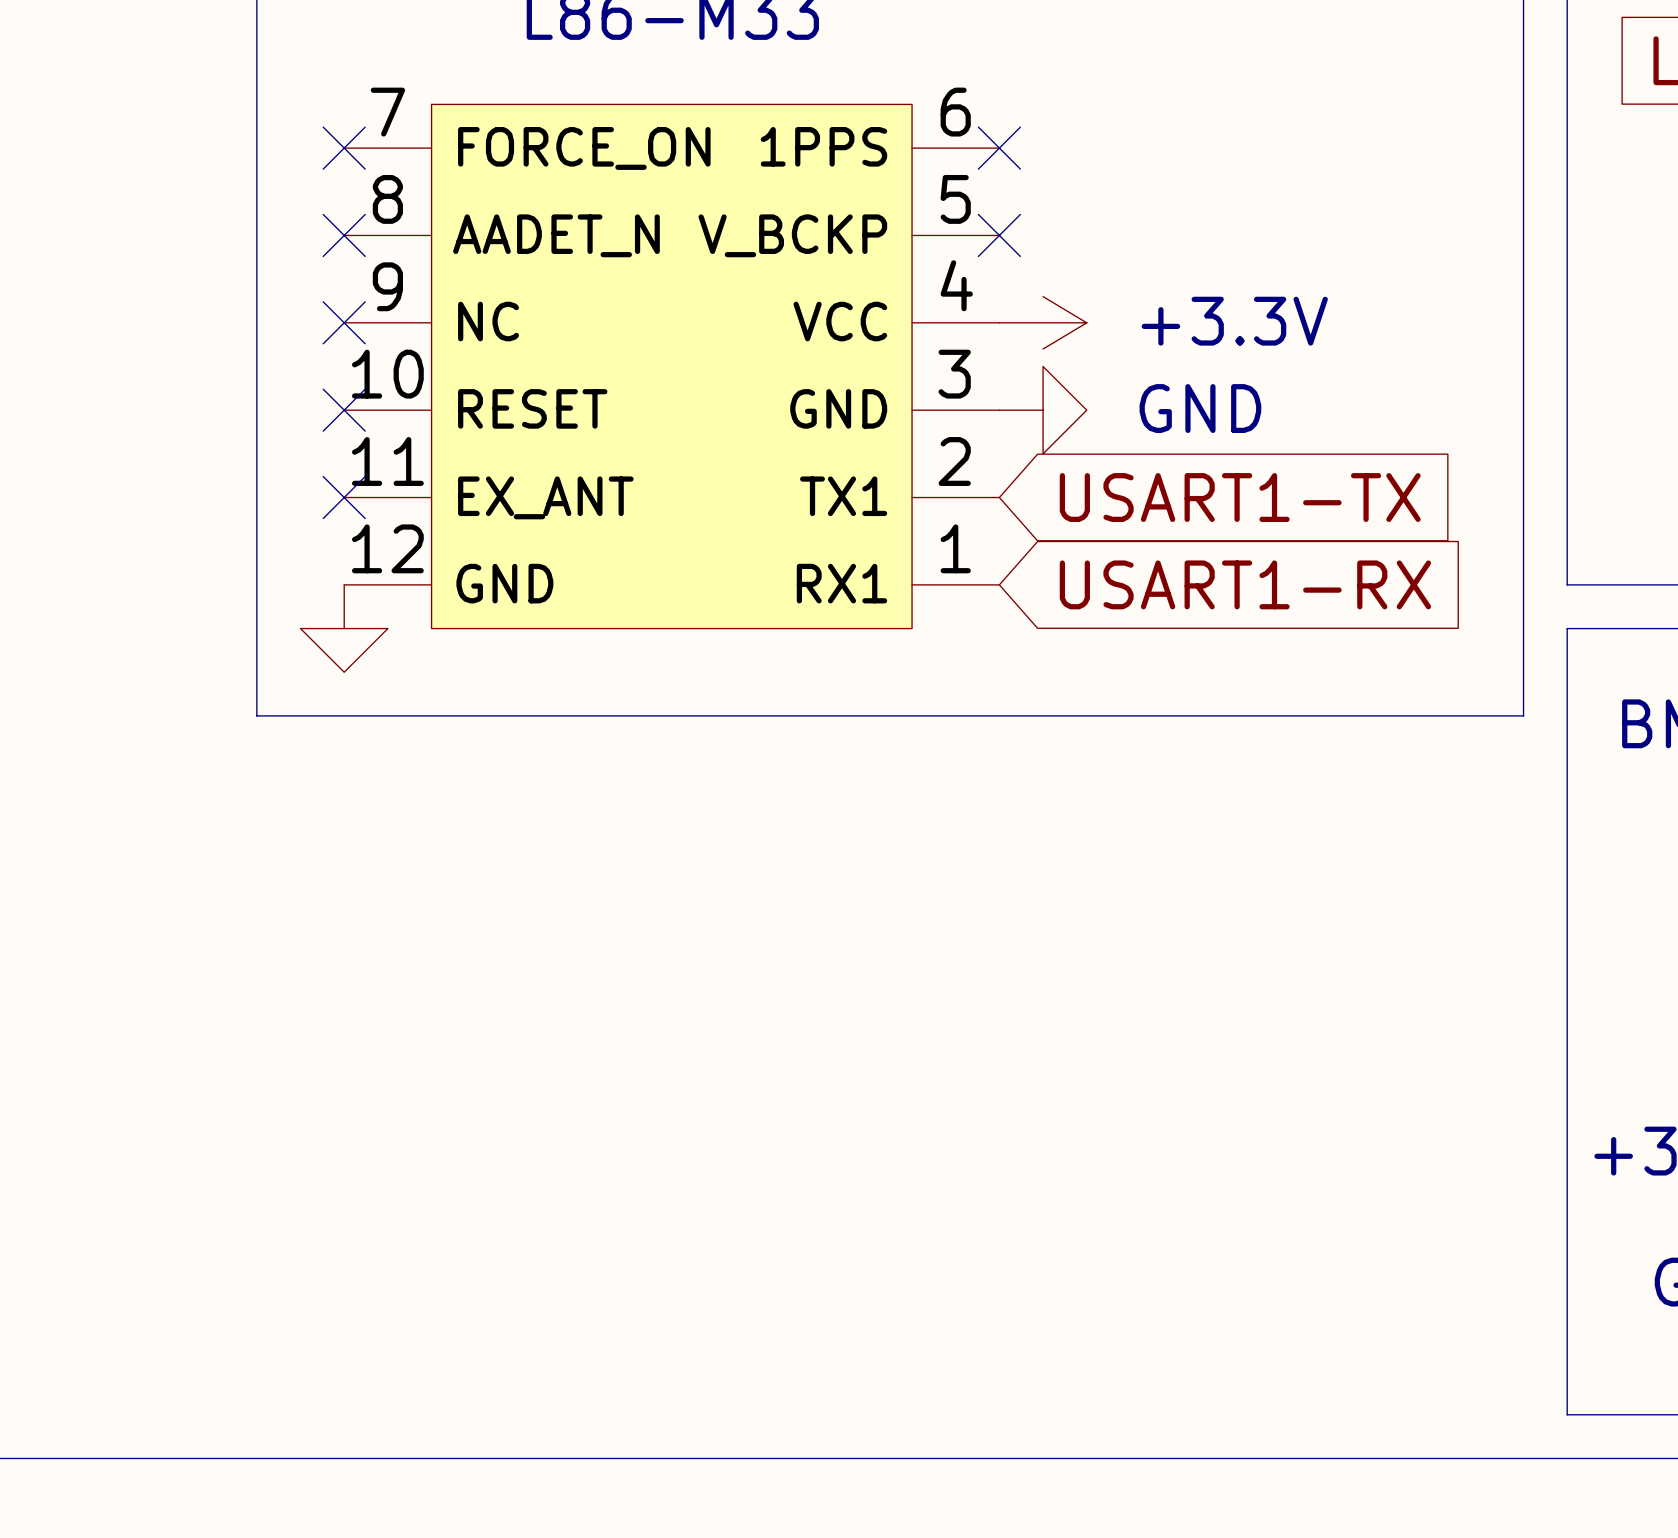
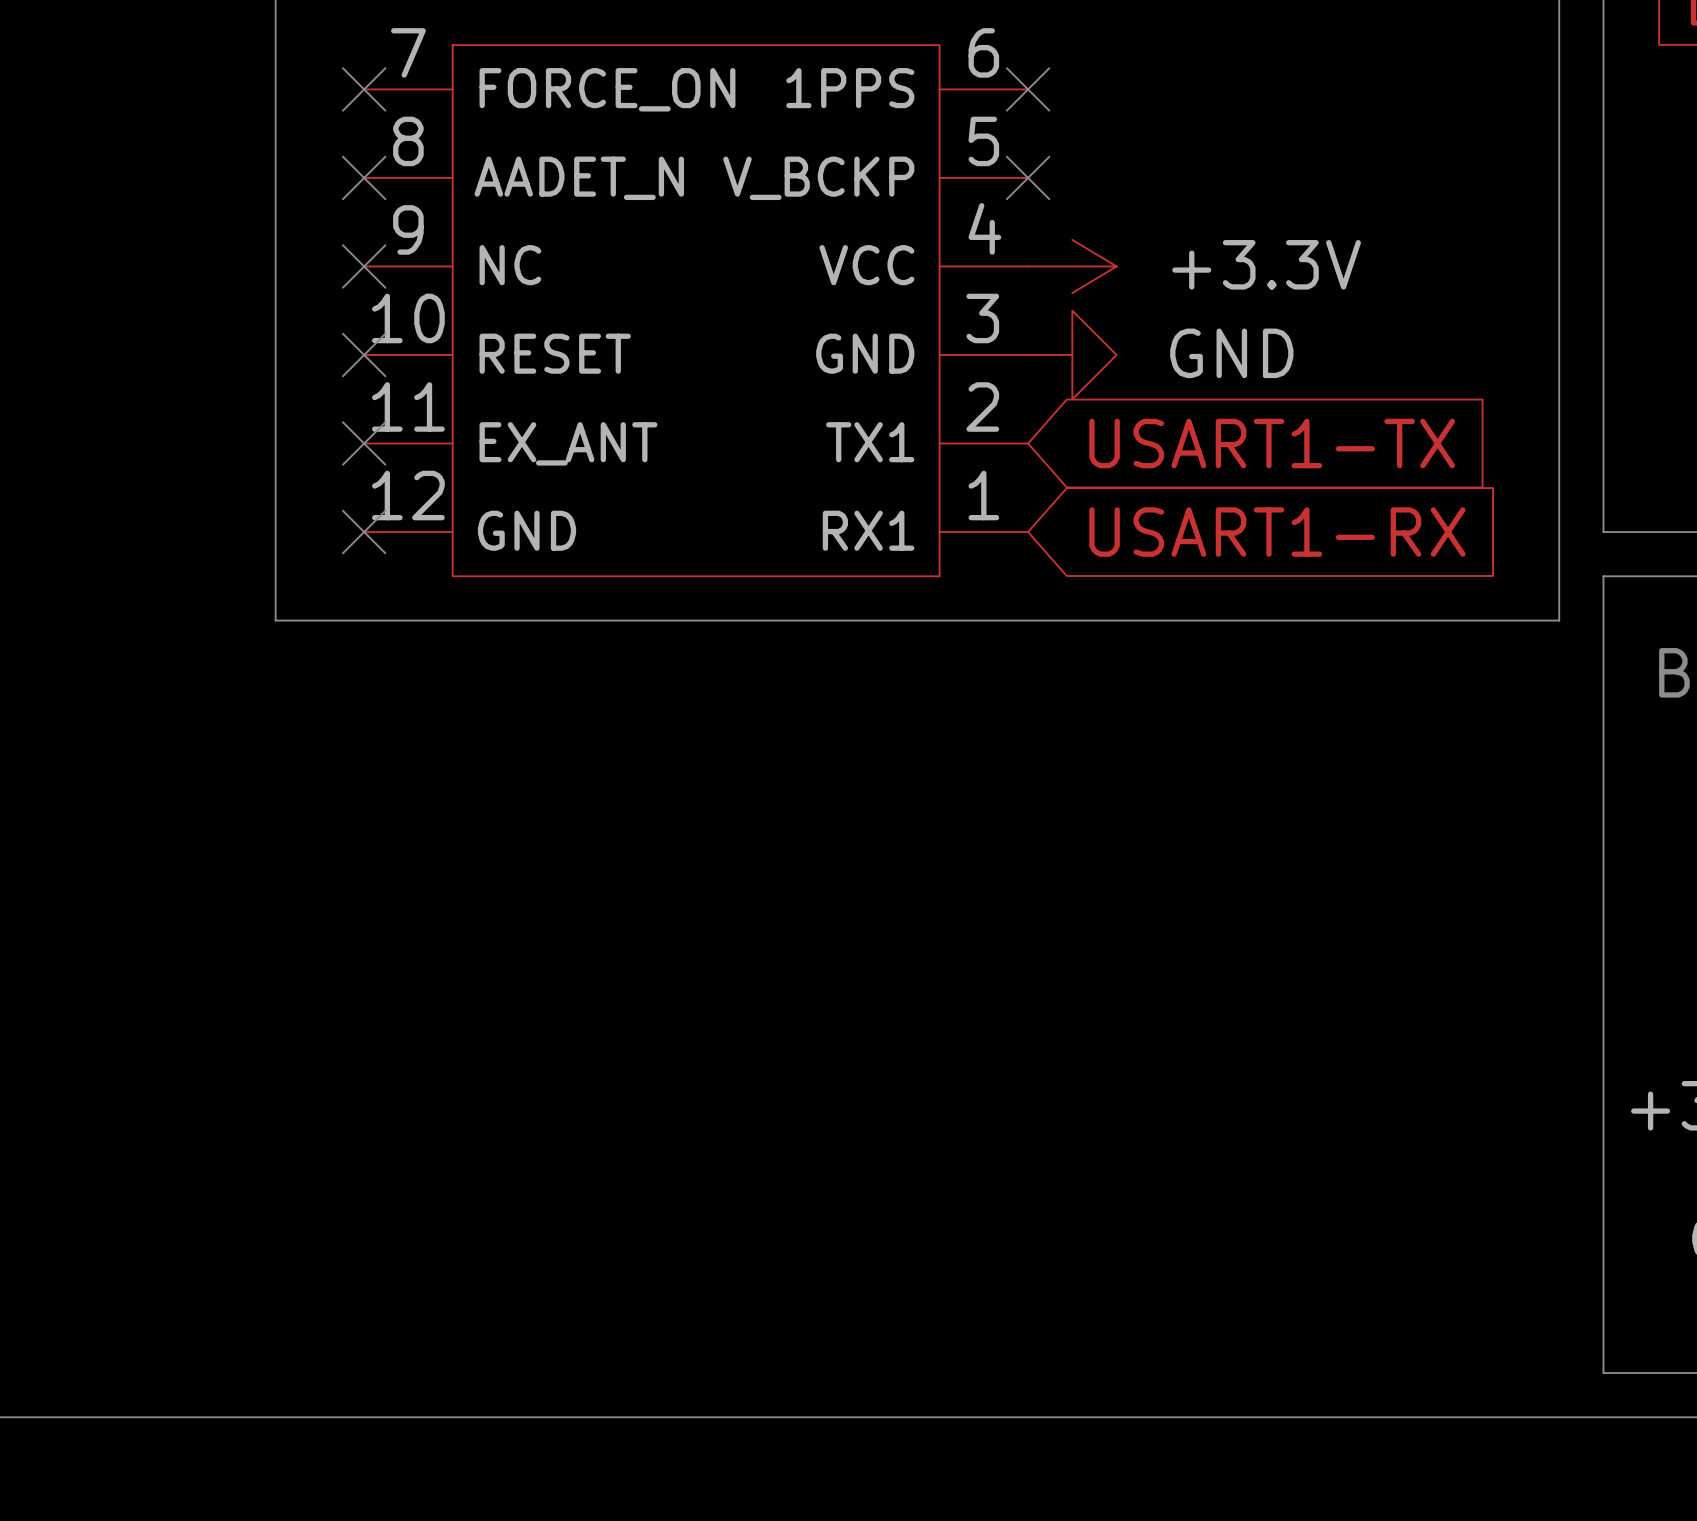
no-connect mark: none -> (364, 532)
power symbol: (344, 628) -> none
line: (256, 672) (256, 715) (1523, 715) (1523, 672) -> (275, 620) (1559, 620)

